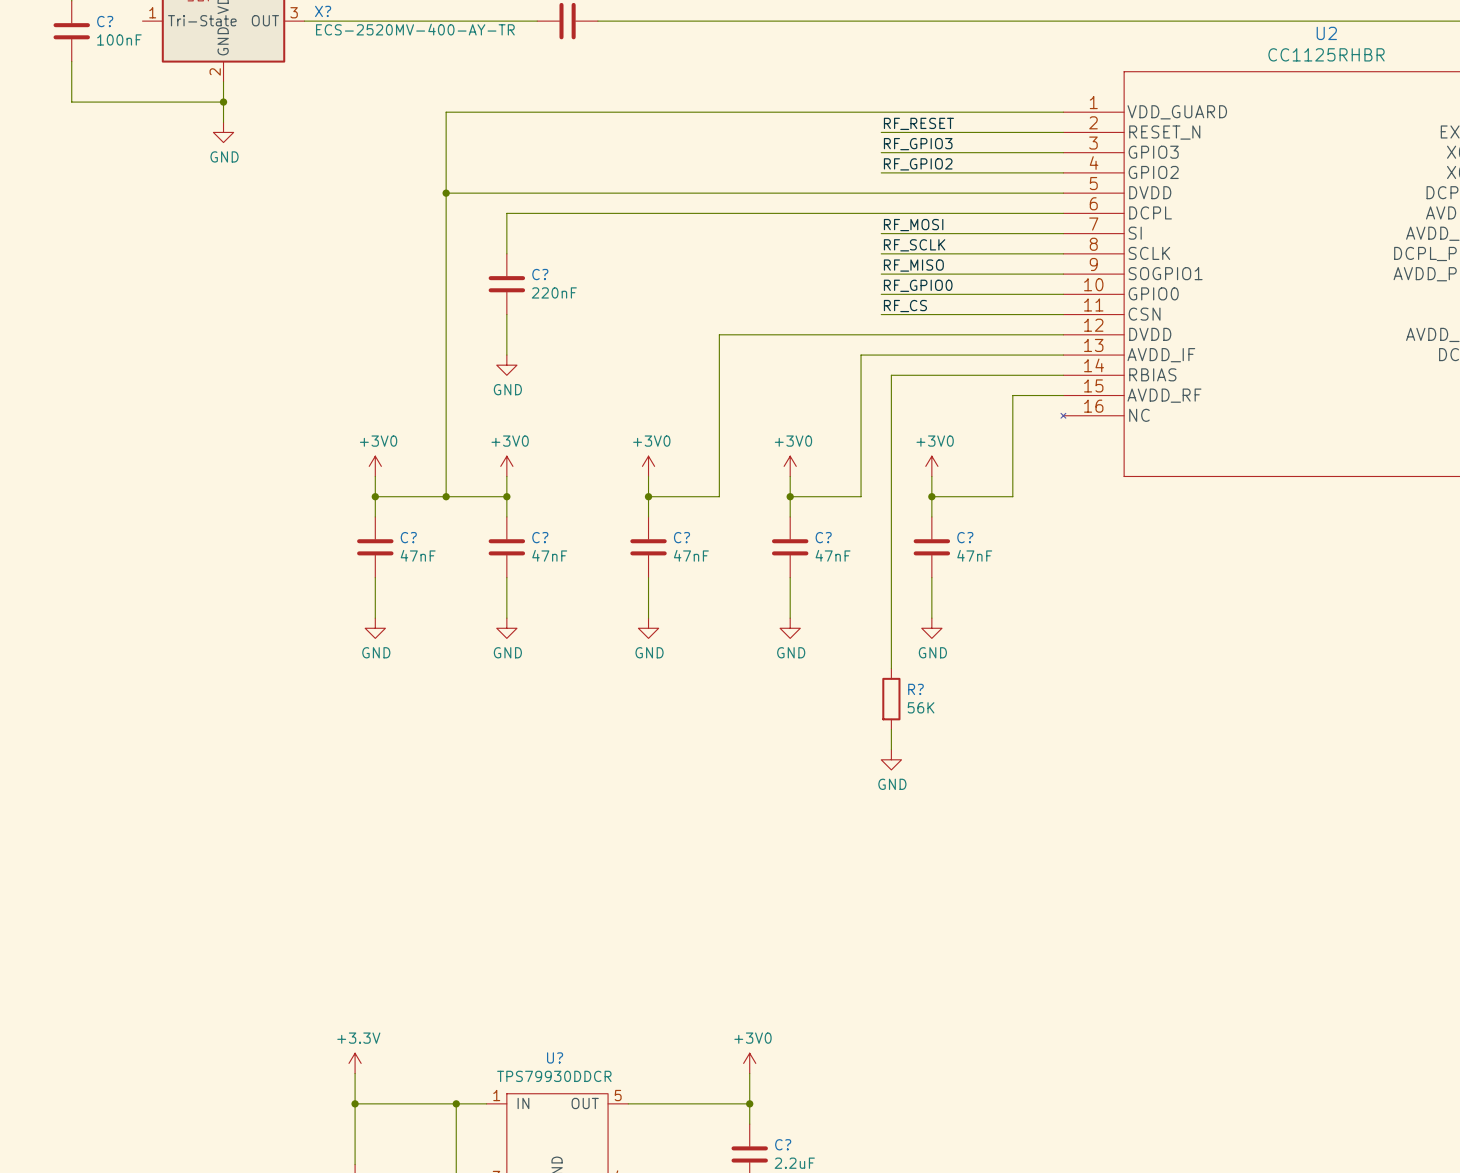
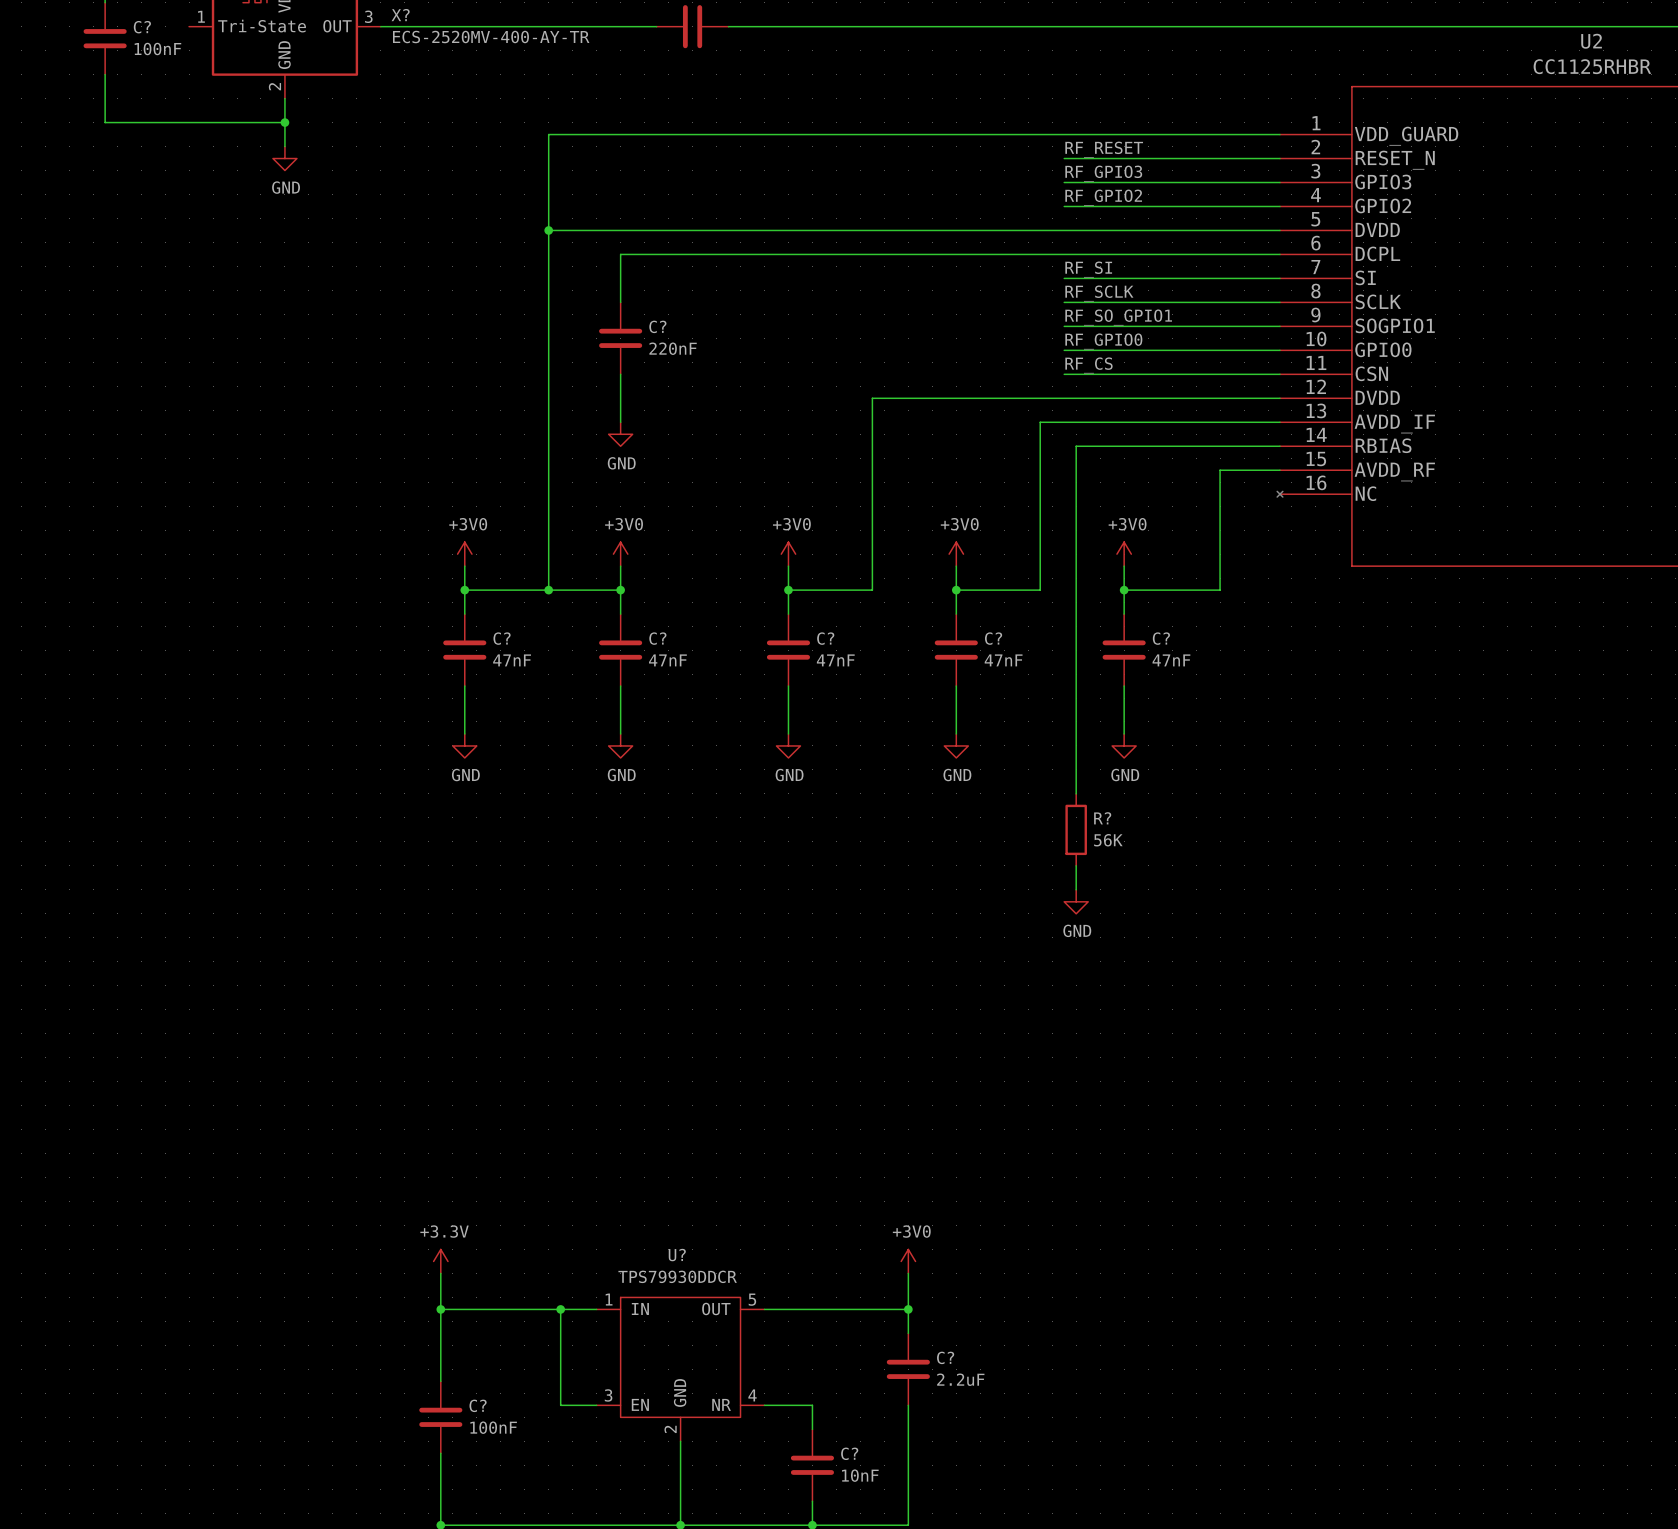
label: RF_MOSI (913, 225) -> RF_SI (1088, 269)
label: RF_MISO (913, 265) -> RF_SO_GPIO1 (1118, 317)

